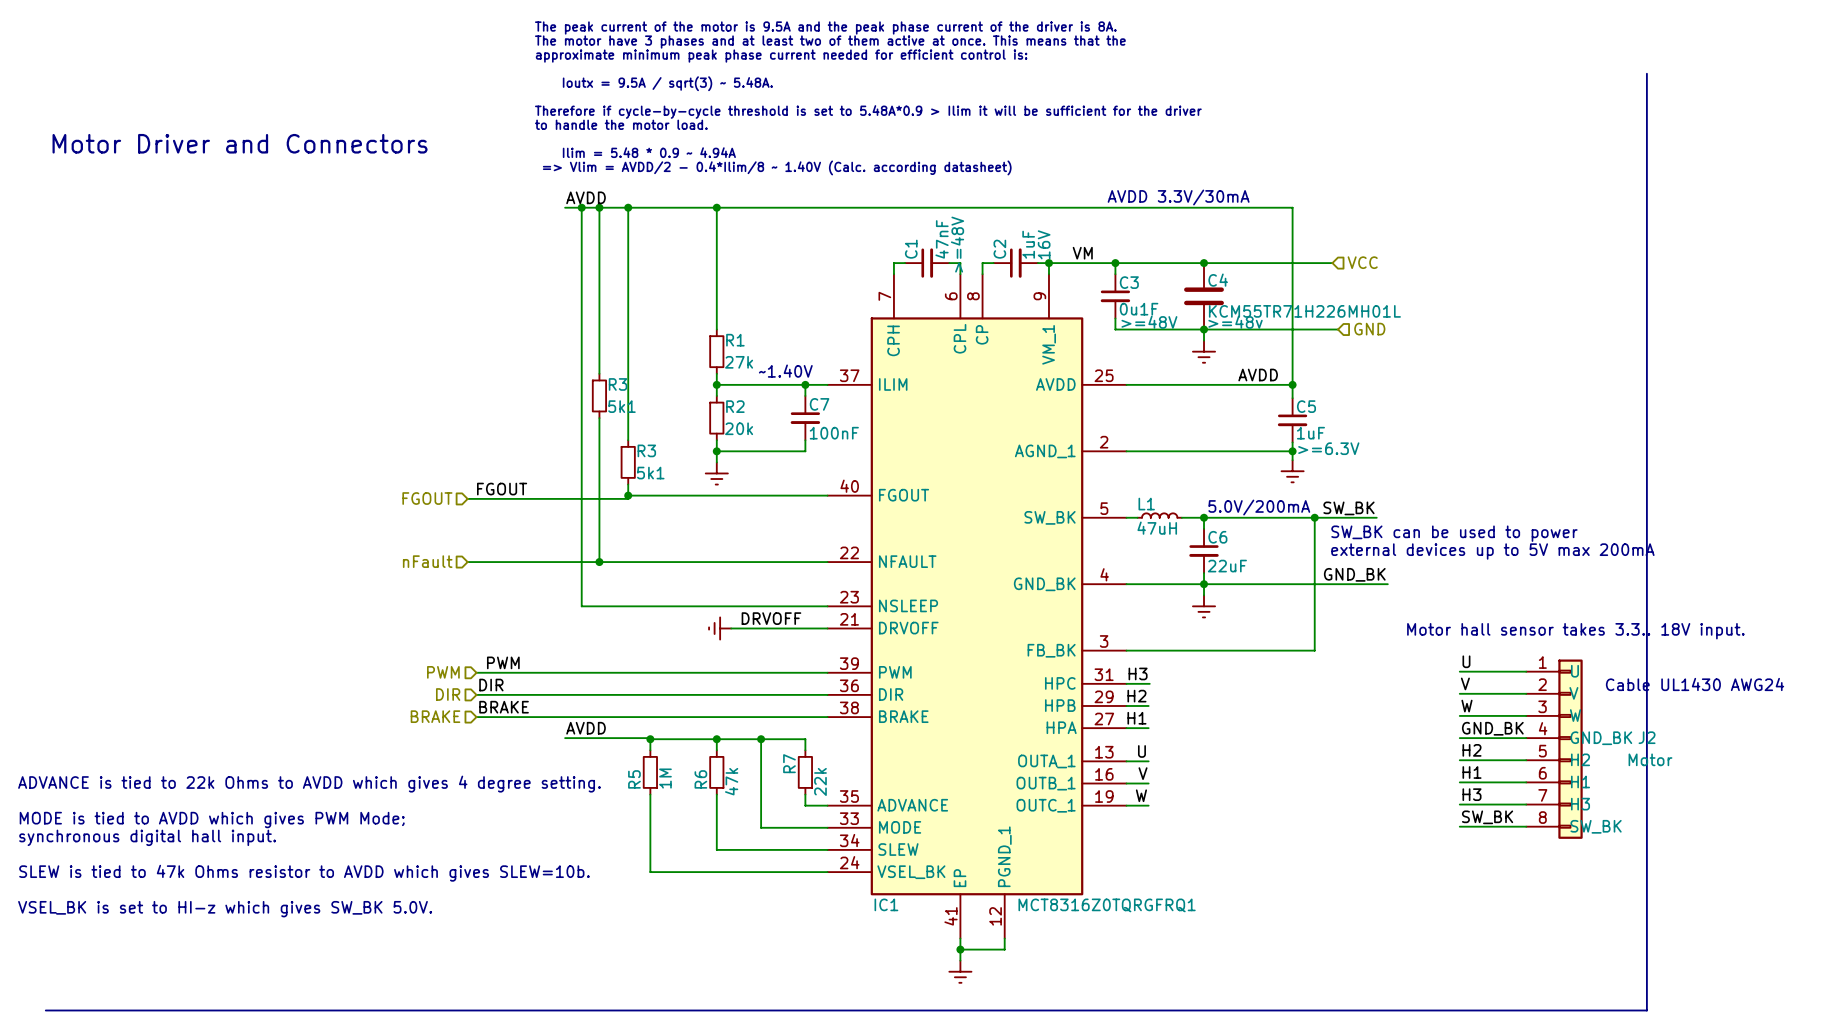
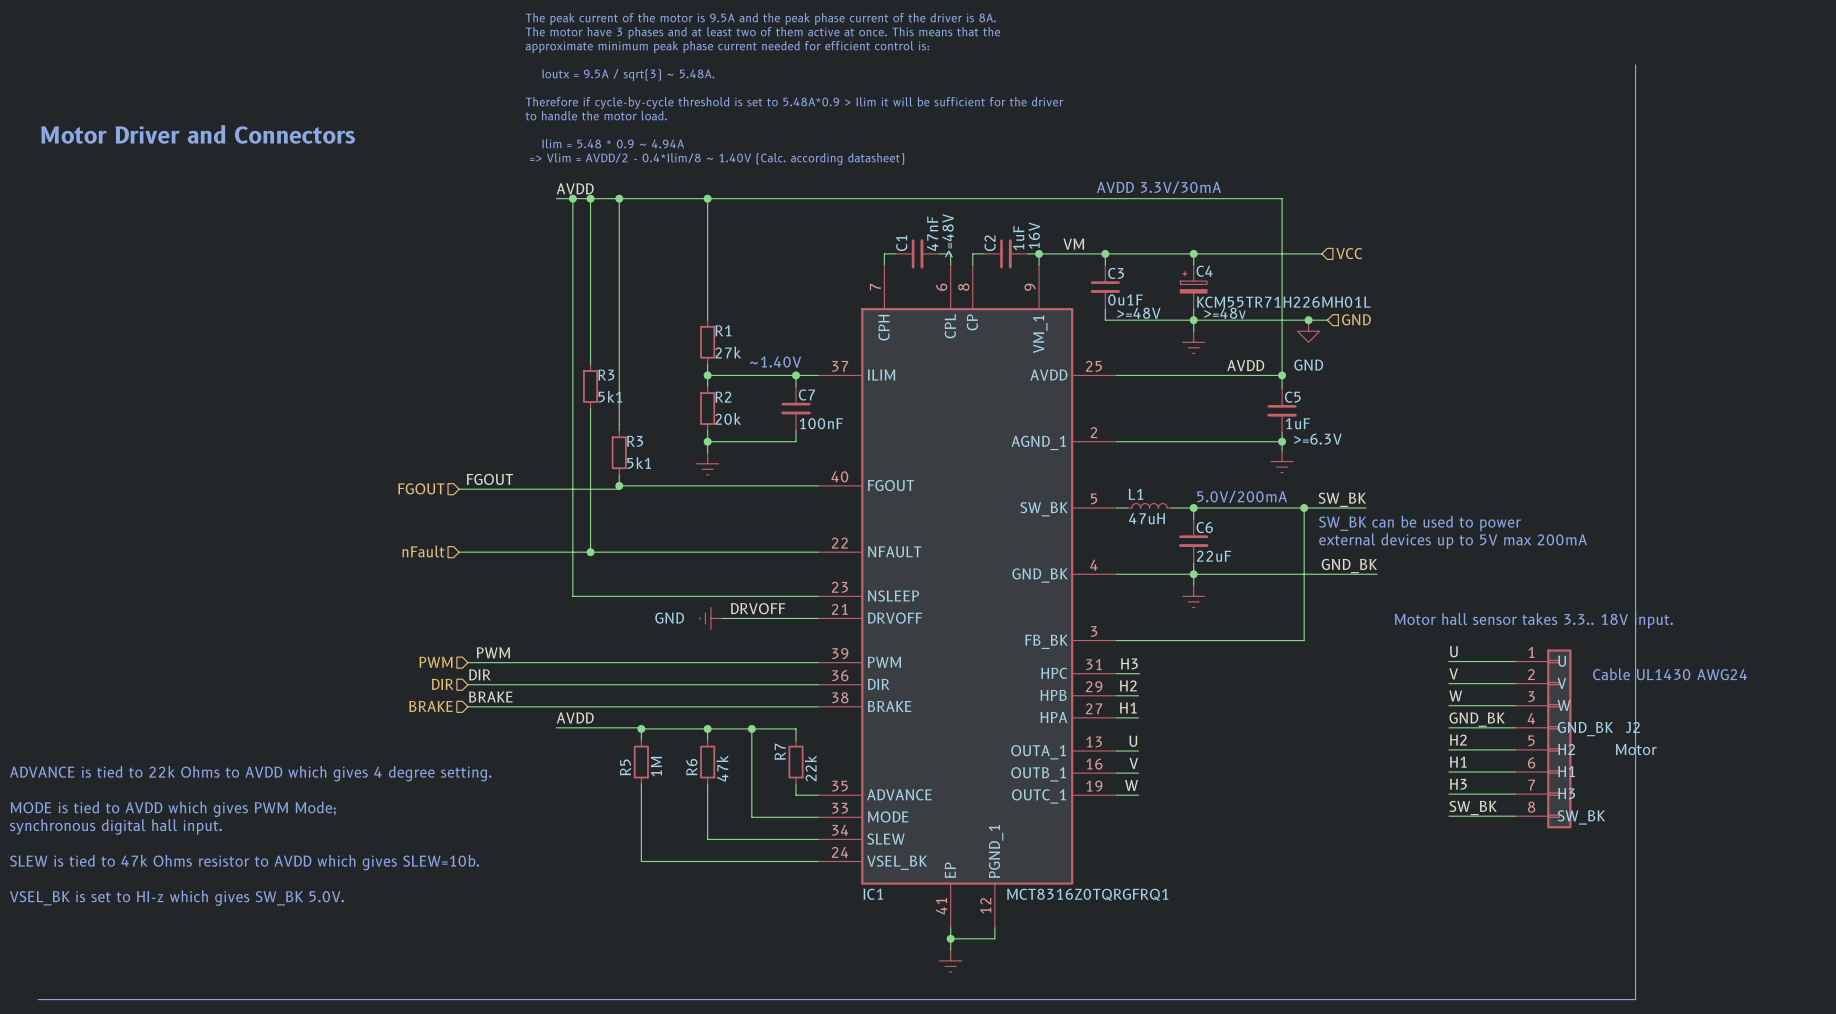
C4 symbol: [1184, 263, 1224, 330] -> [1180, 264, 1207, 310]
junction: none -> (1308, 320)
power symbol: none -> GND (1308, 331)
power symbol text: none -> GND (669, 618)

